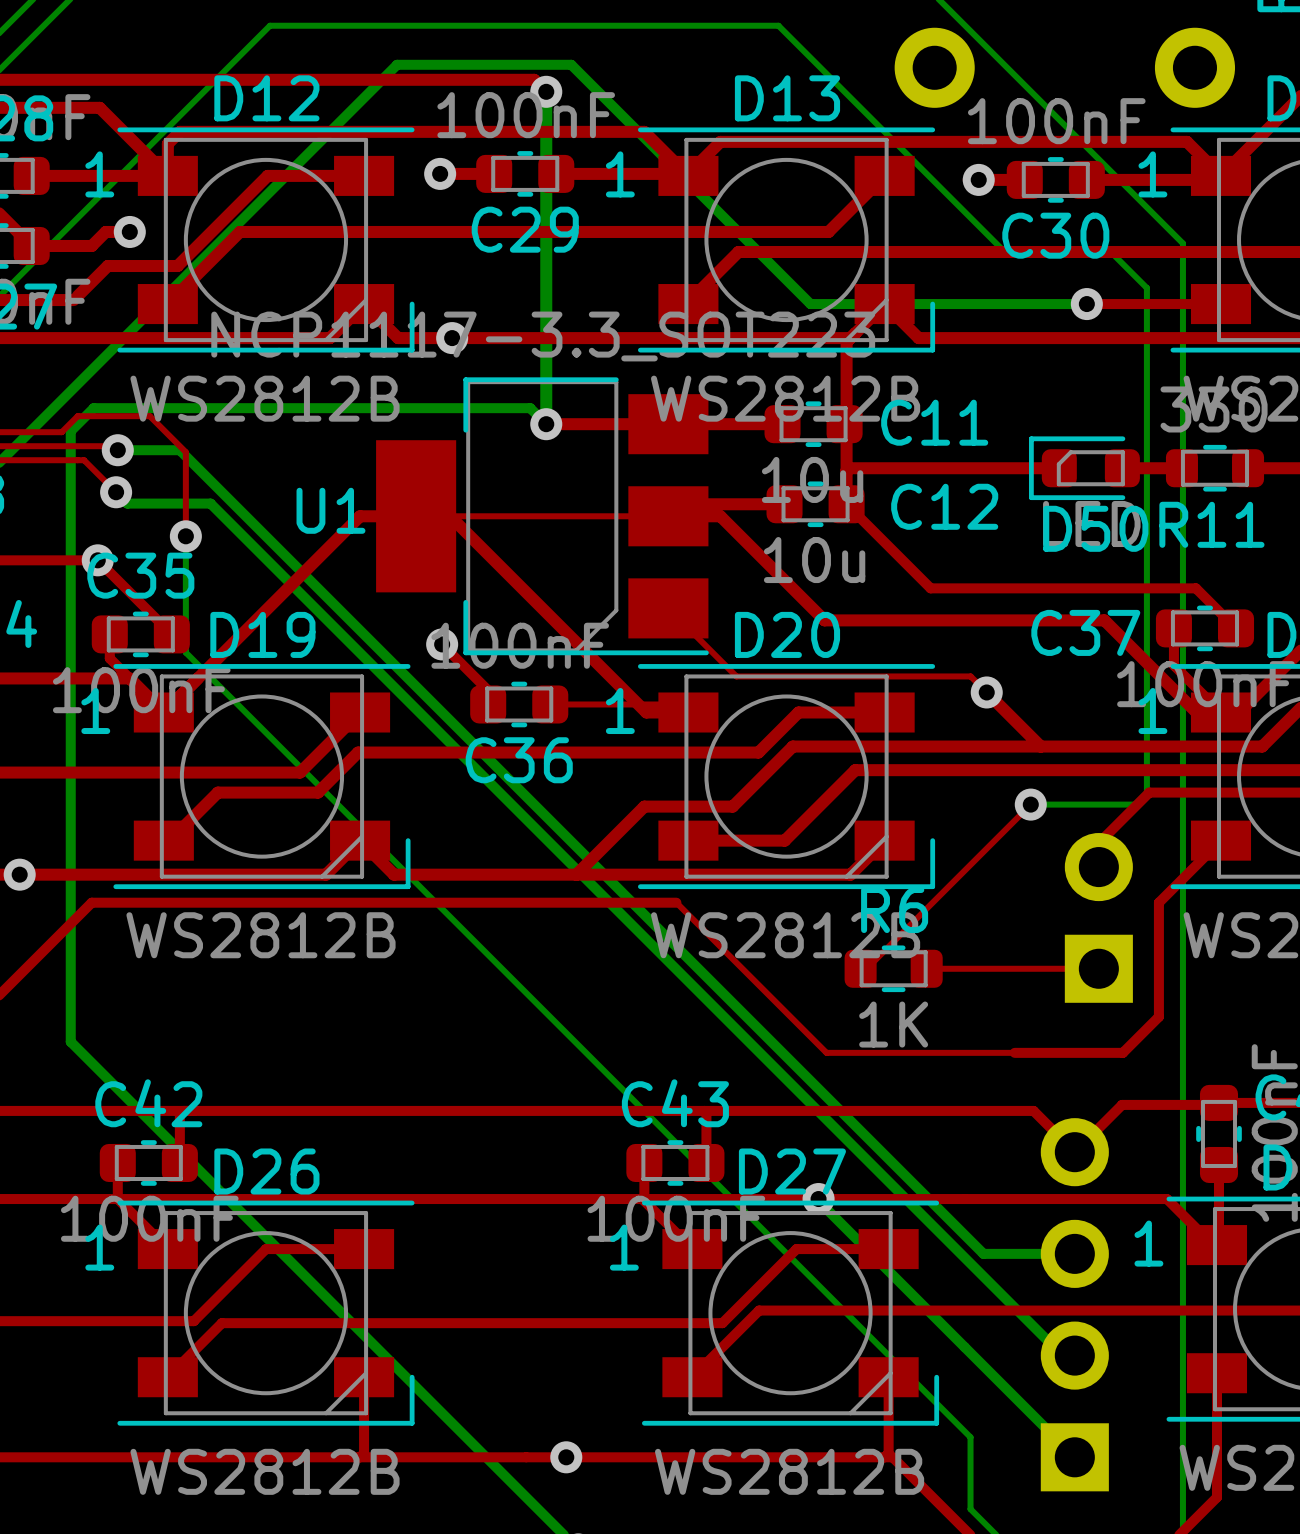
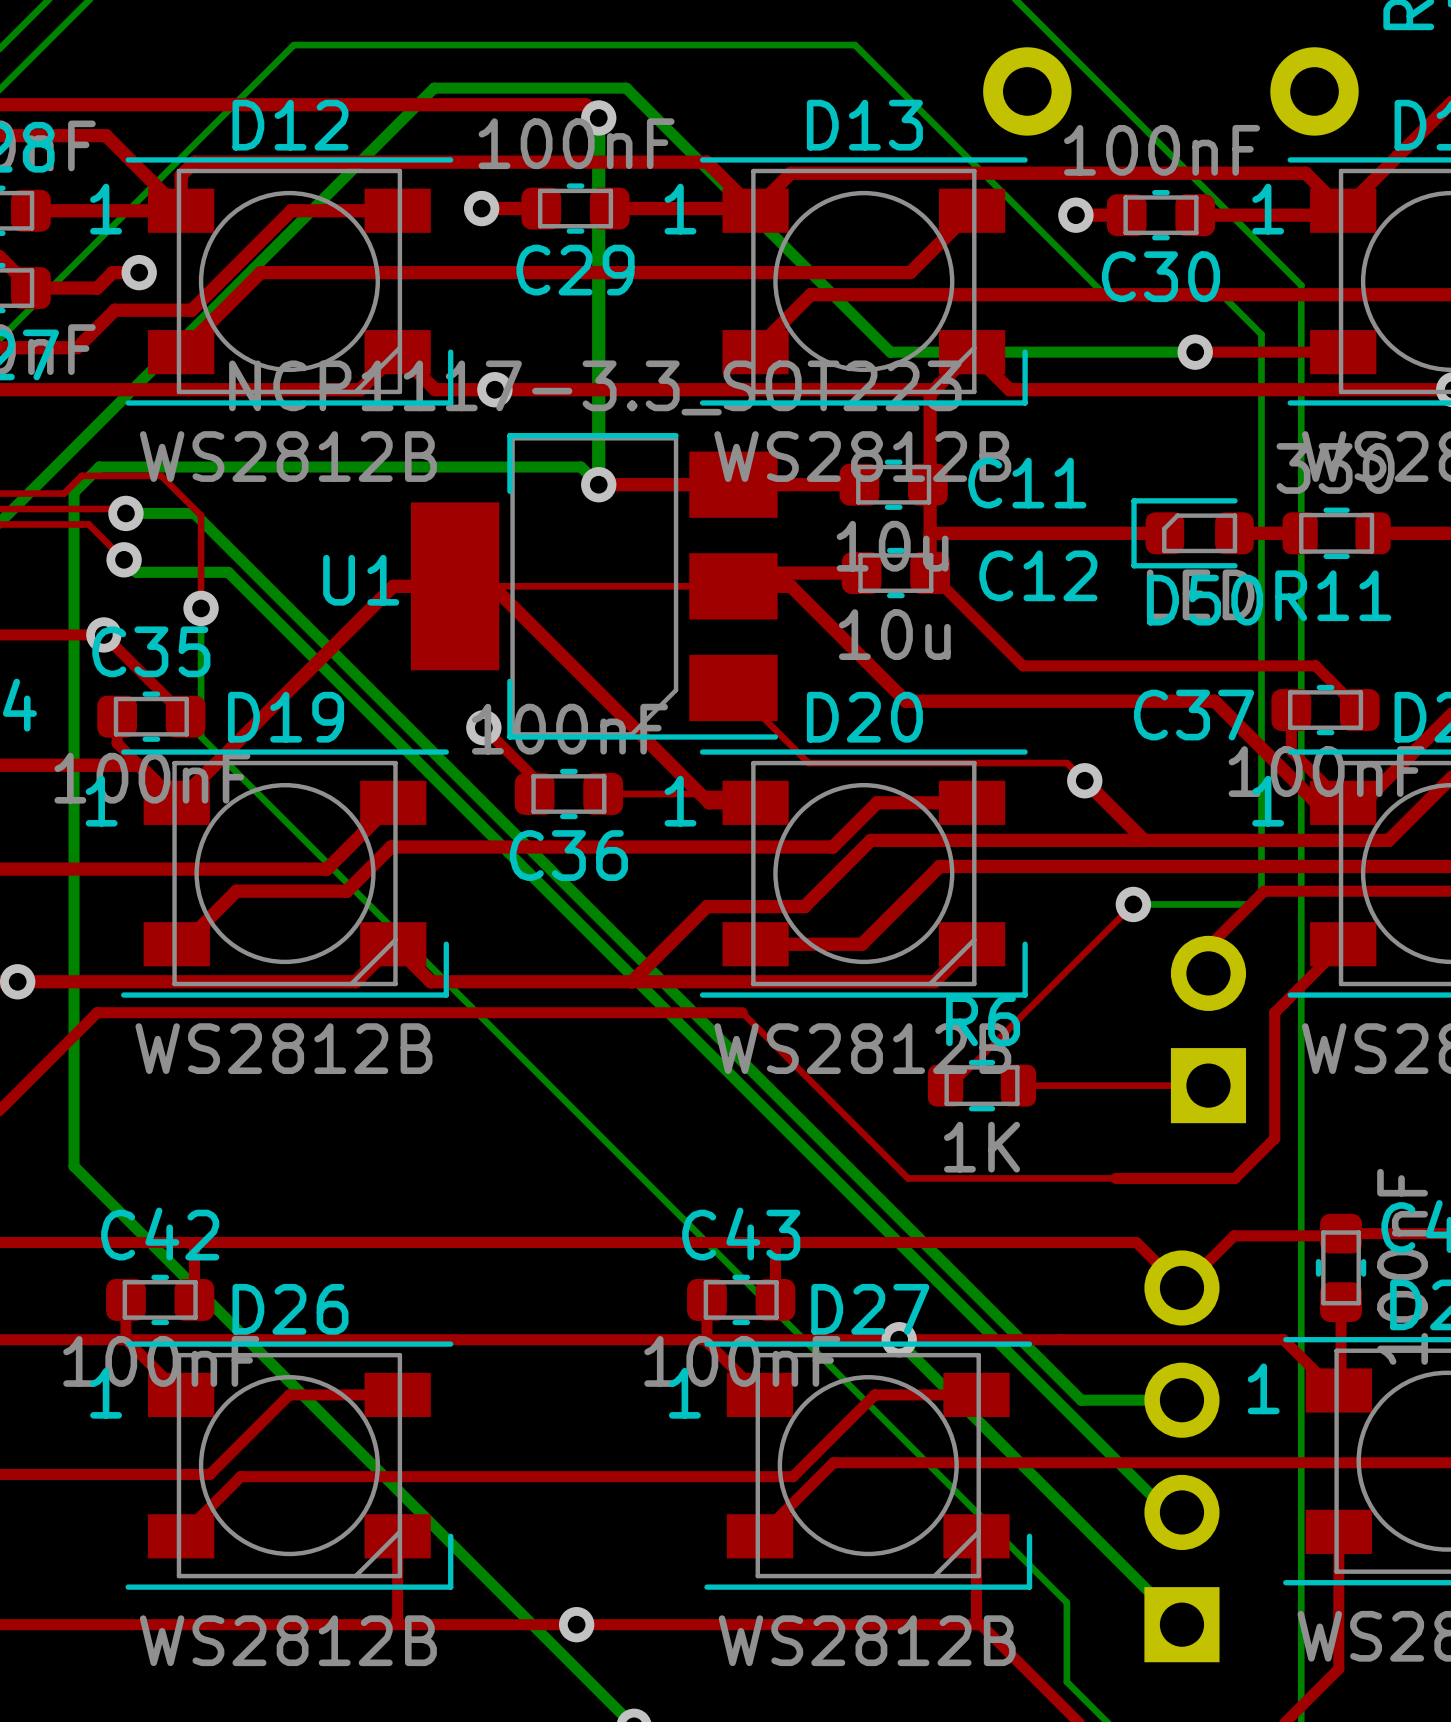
via position: (566, 1457) -> (576, 1624)

